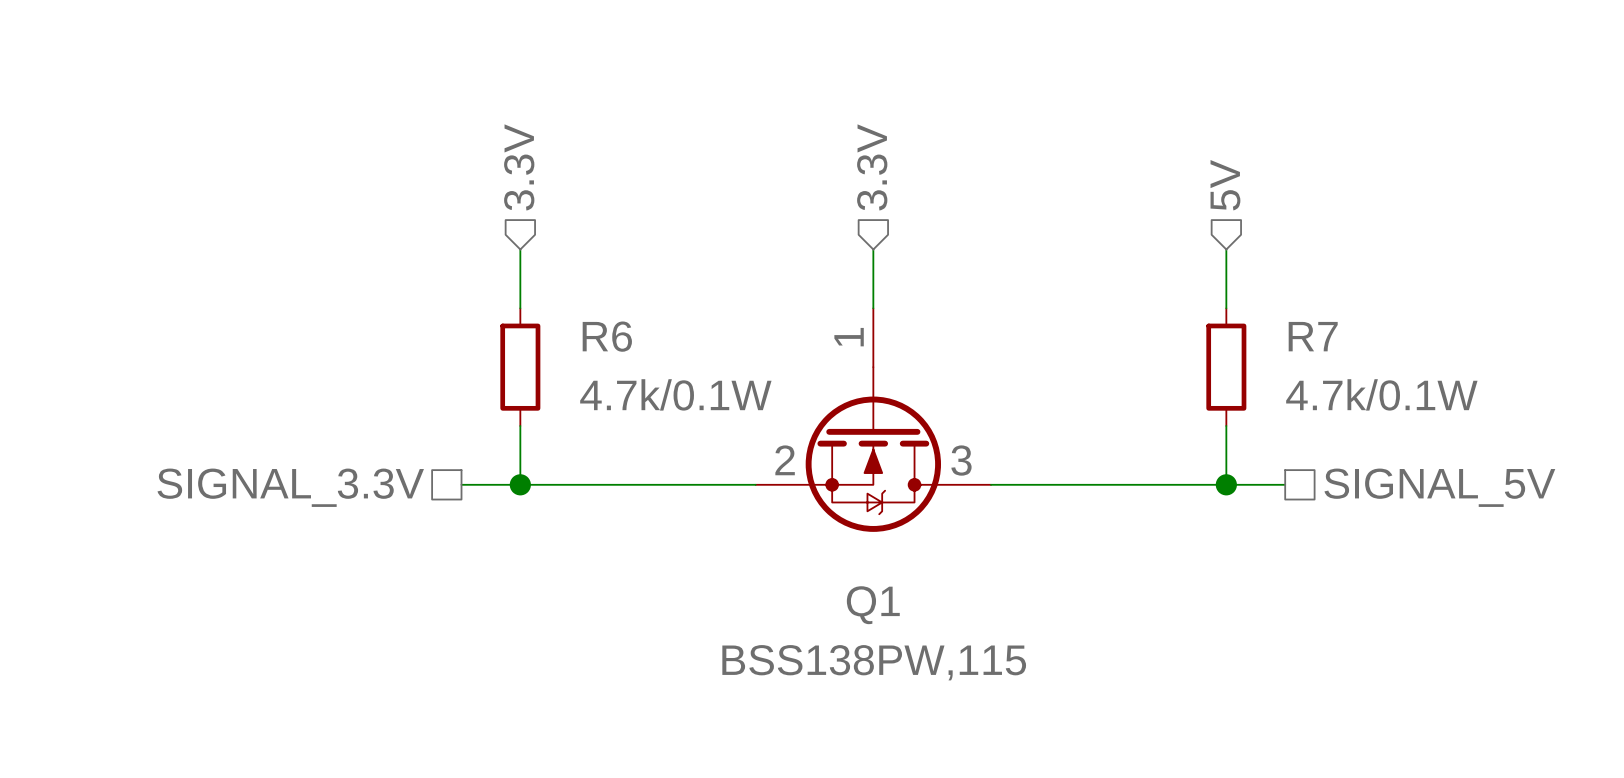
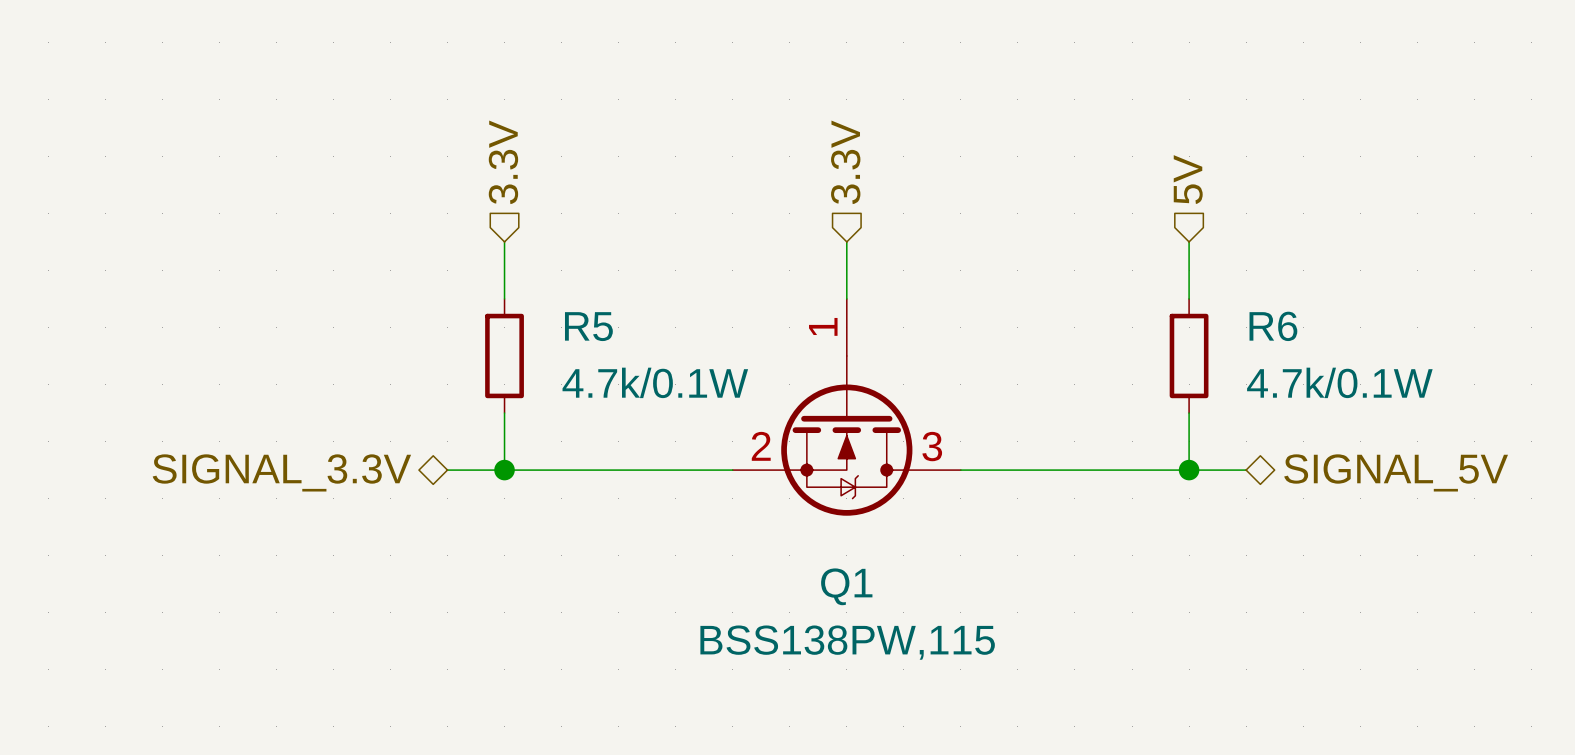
R6 name: R6 (607, 336) -> R5 (588, 326)
R7 name: R7 (1313, 336) -> R6 (1273, 326)
hierarchical label shape: passive (290, 487) -> bidirectional (281, 472)
hierarchical label shape: passive (1439, 487) -> bidirectional (1396, 472)

